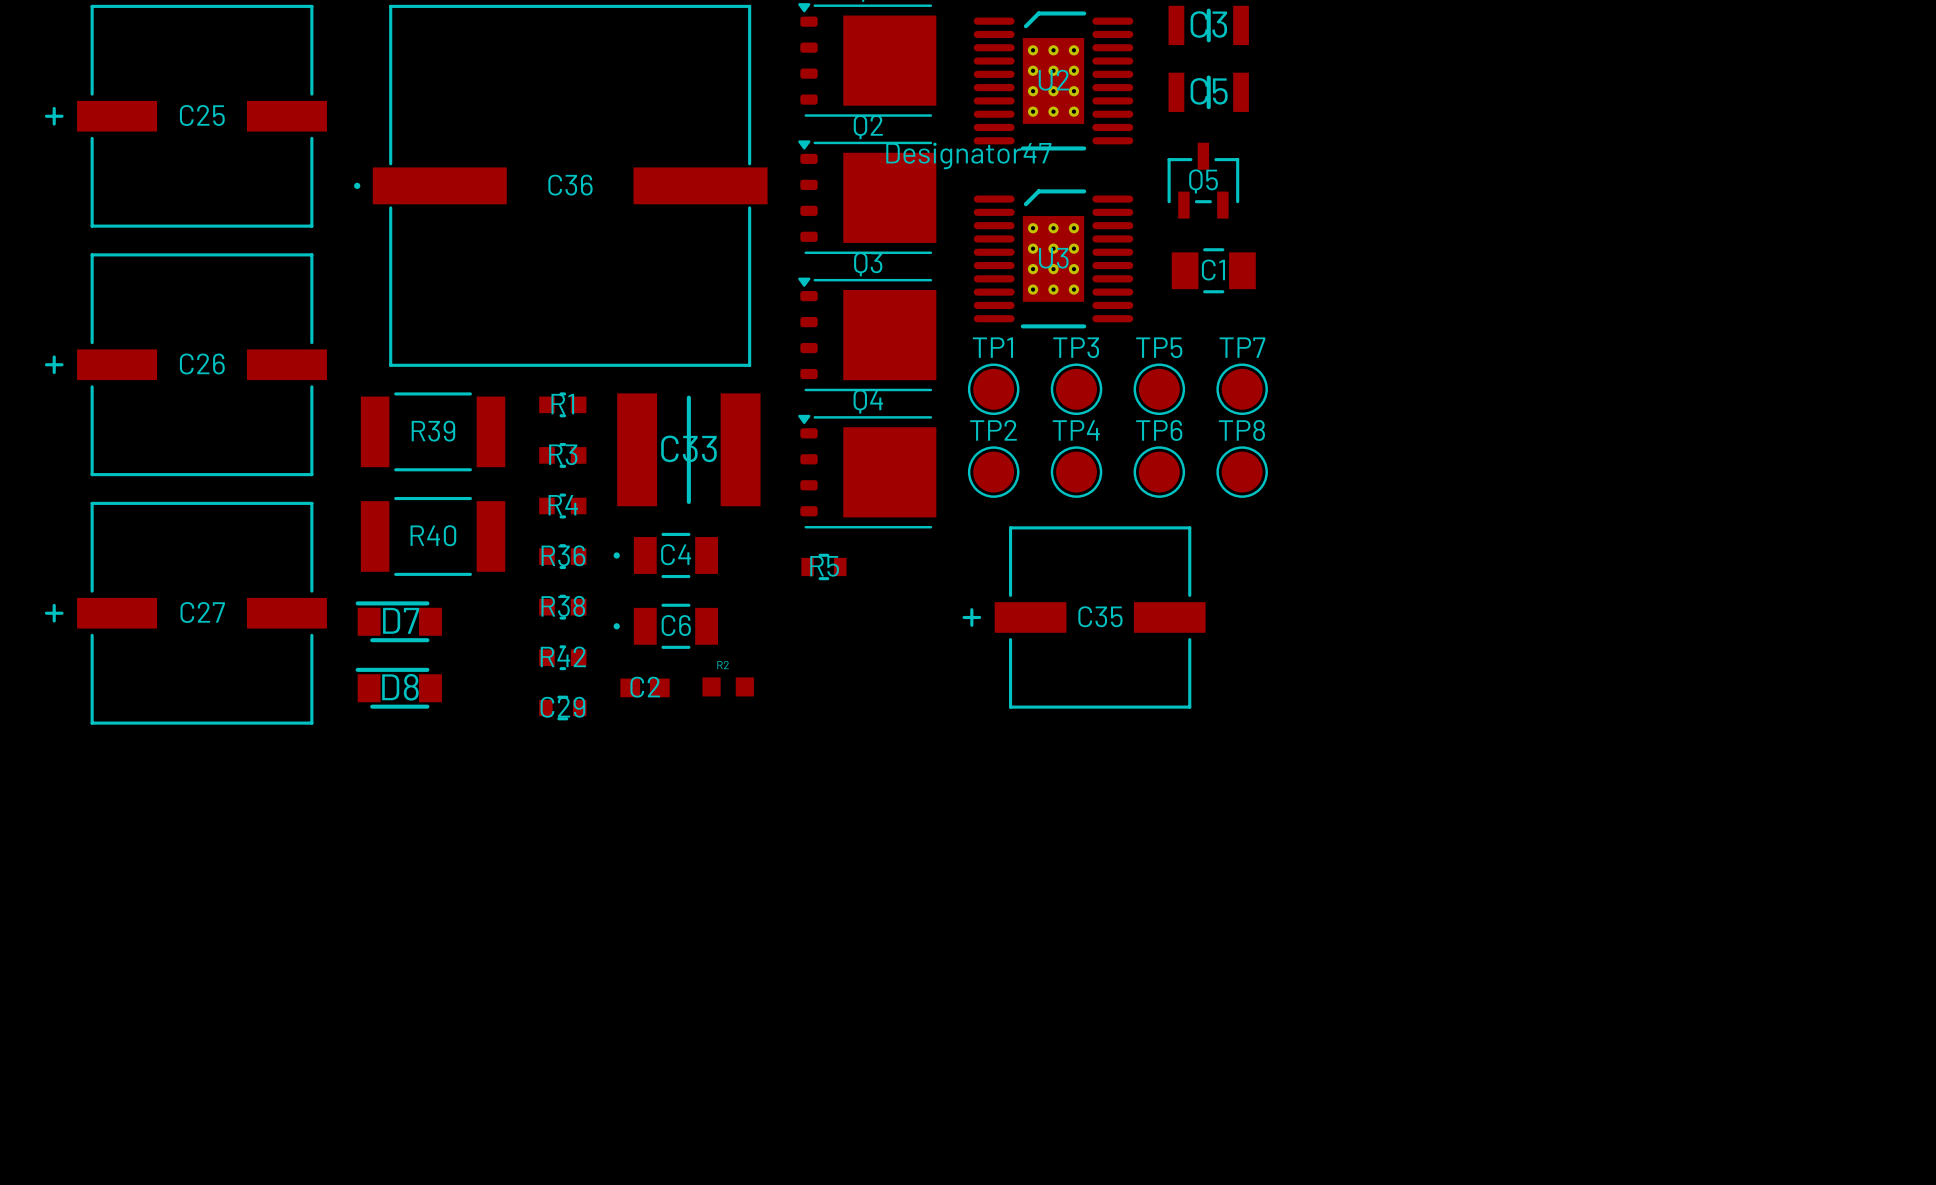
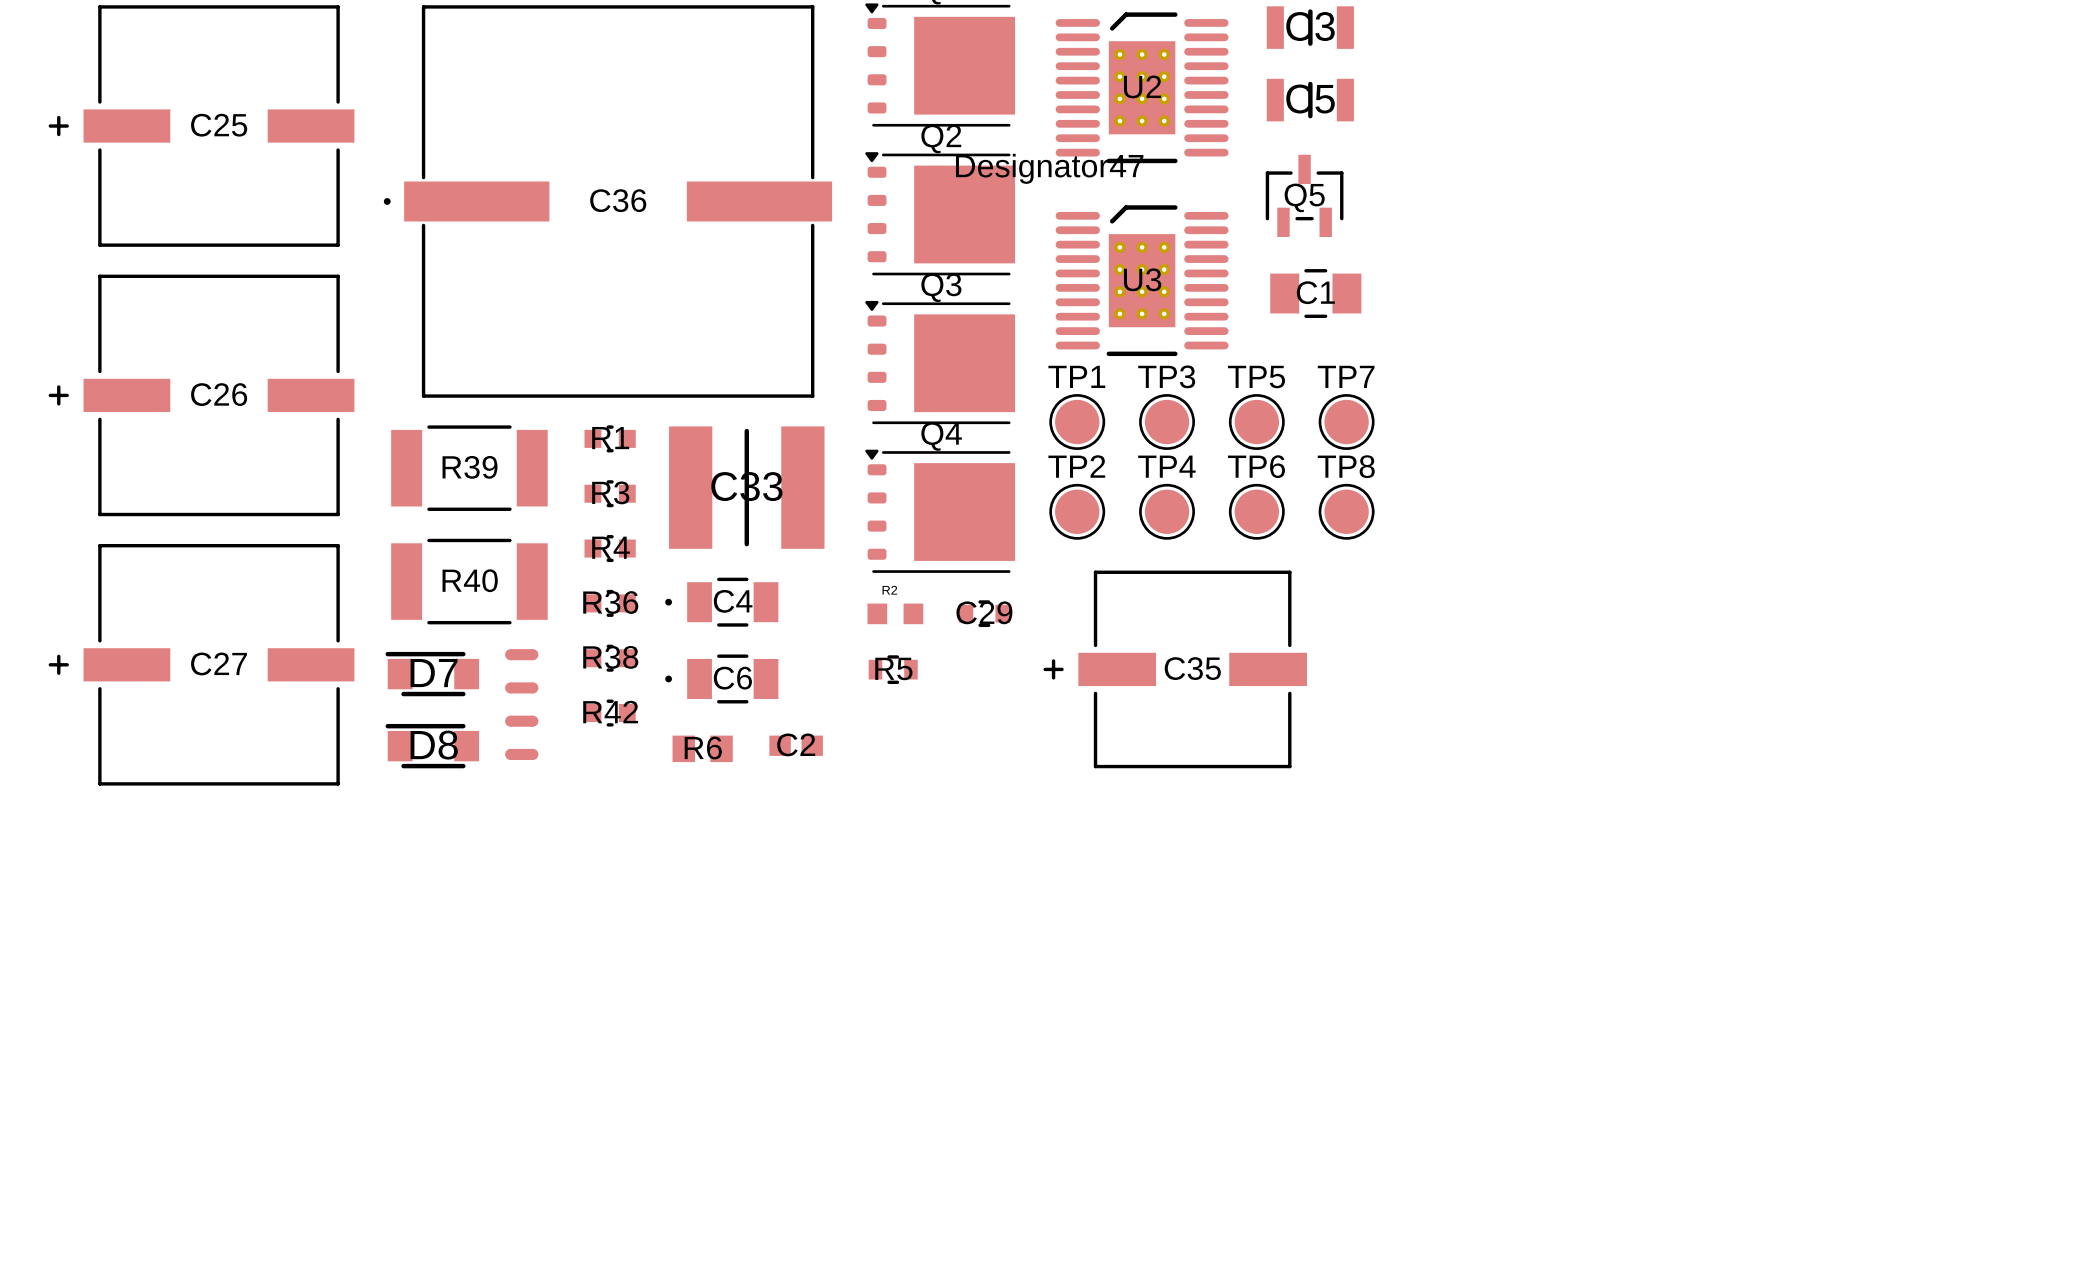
R5 position: (823, 566) -> (893, 669)
part: none -> (521, 654)
part: none -> (521, 687)
part: none -> (521, 721)
R2 position: (728, 686) -> (895, 613)
C2 position: (645, 687) -> (796, 745)
R6: none -> (702, 748)
part: none -> (521, 754)
C29 position: (562, 708) -> (984, 613)

